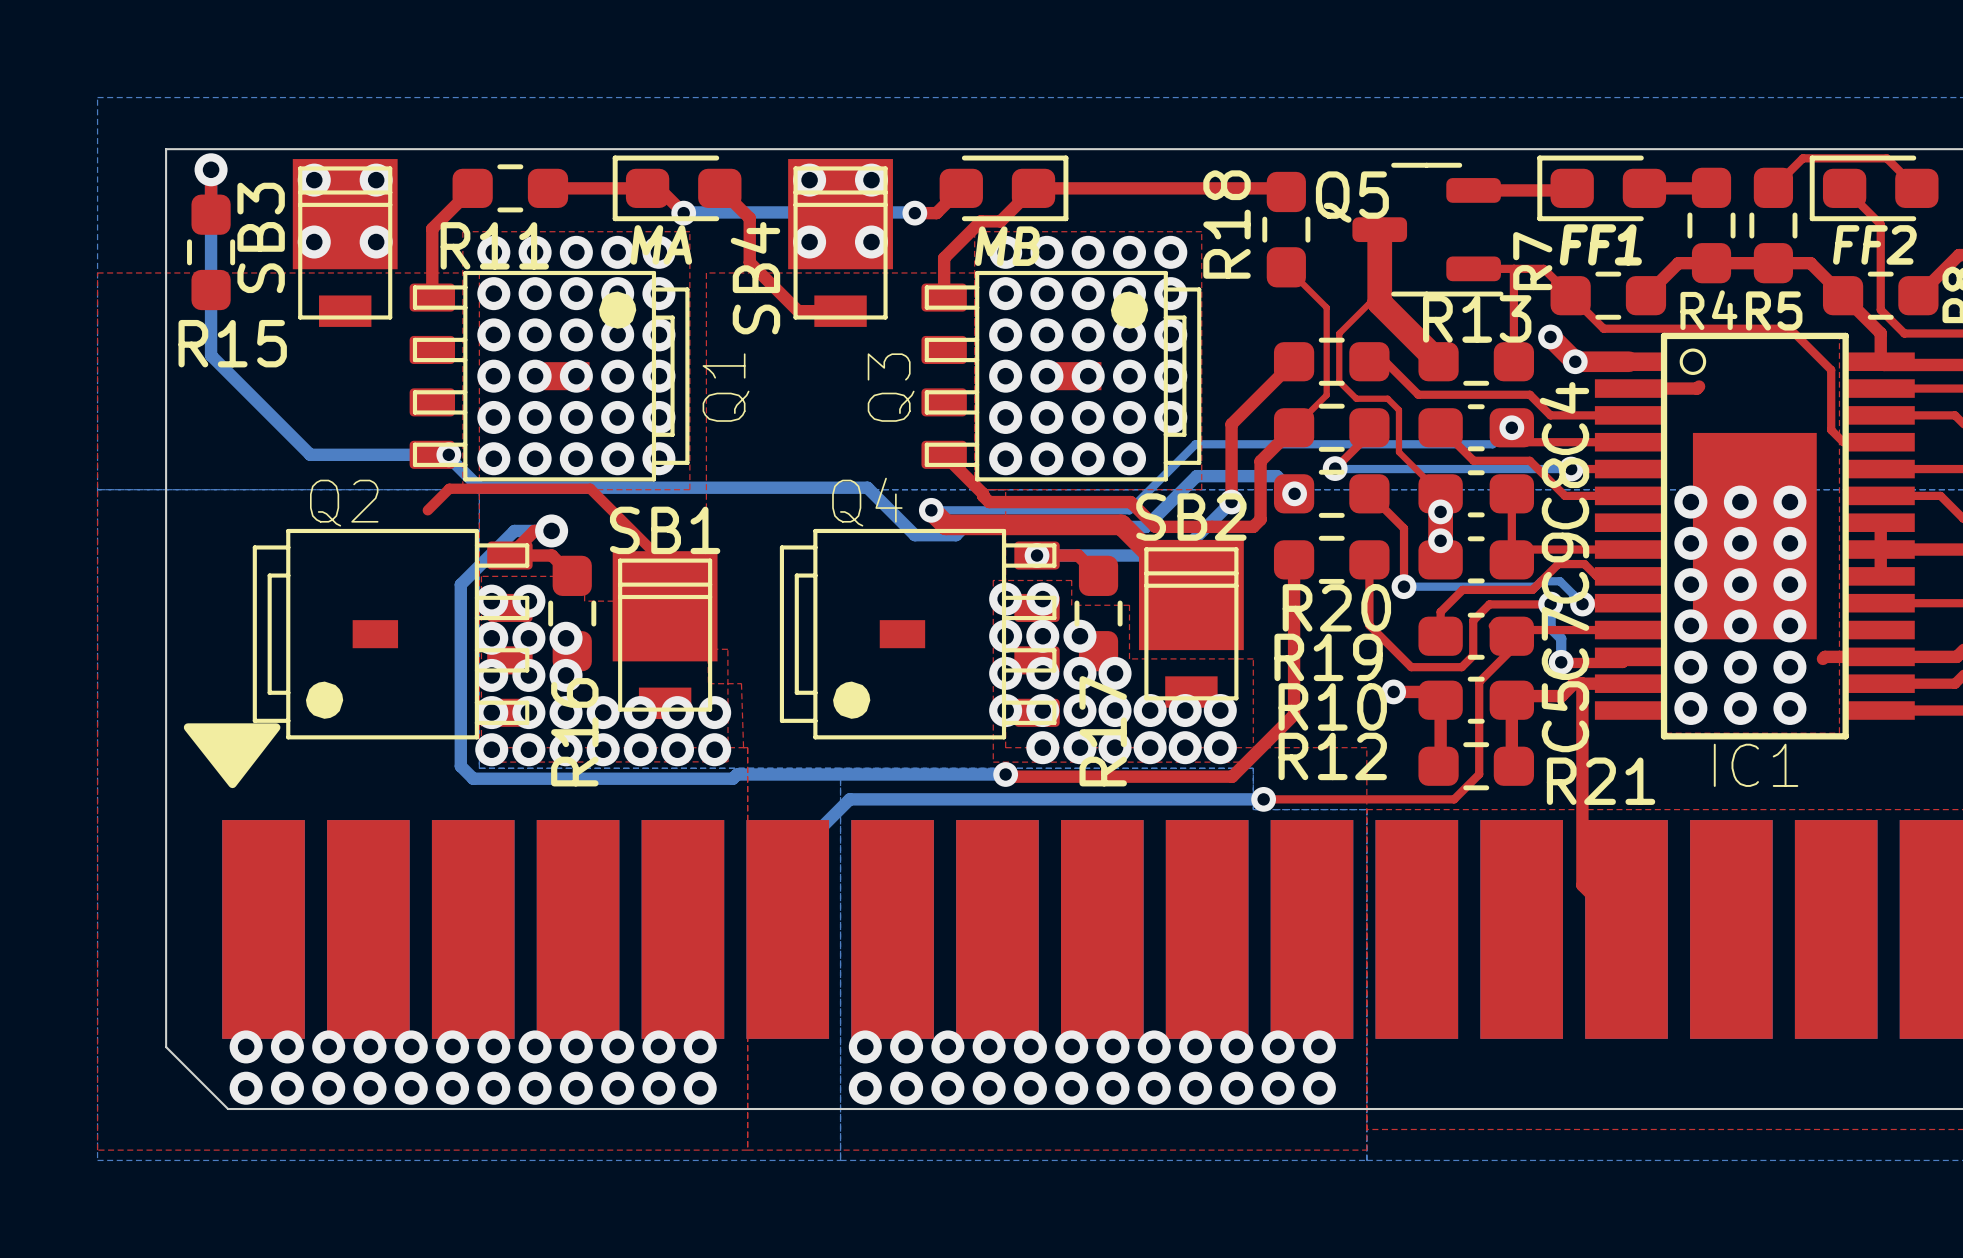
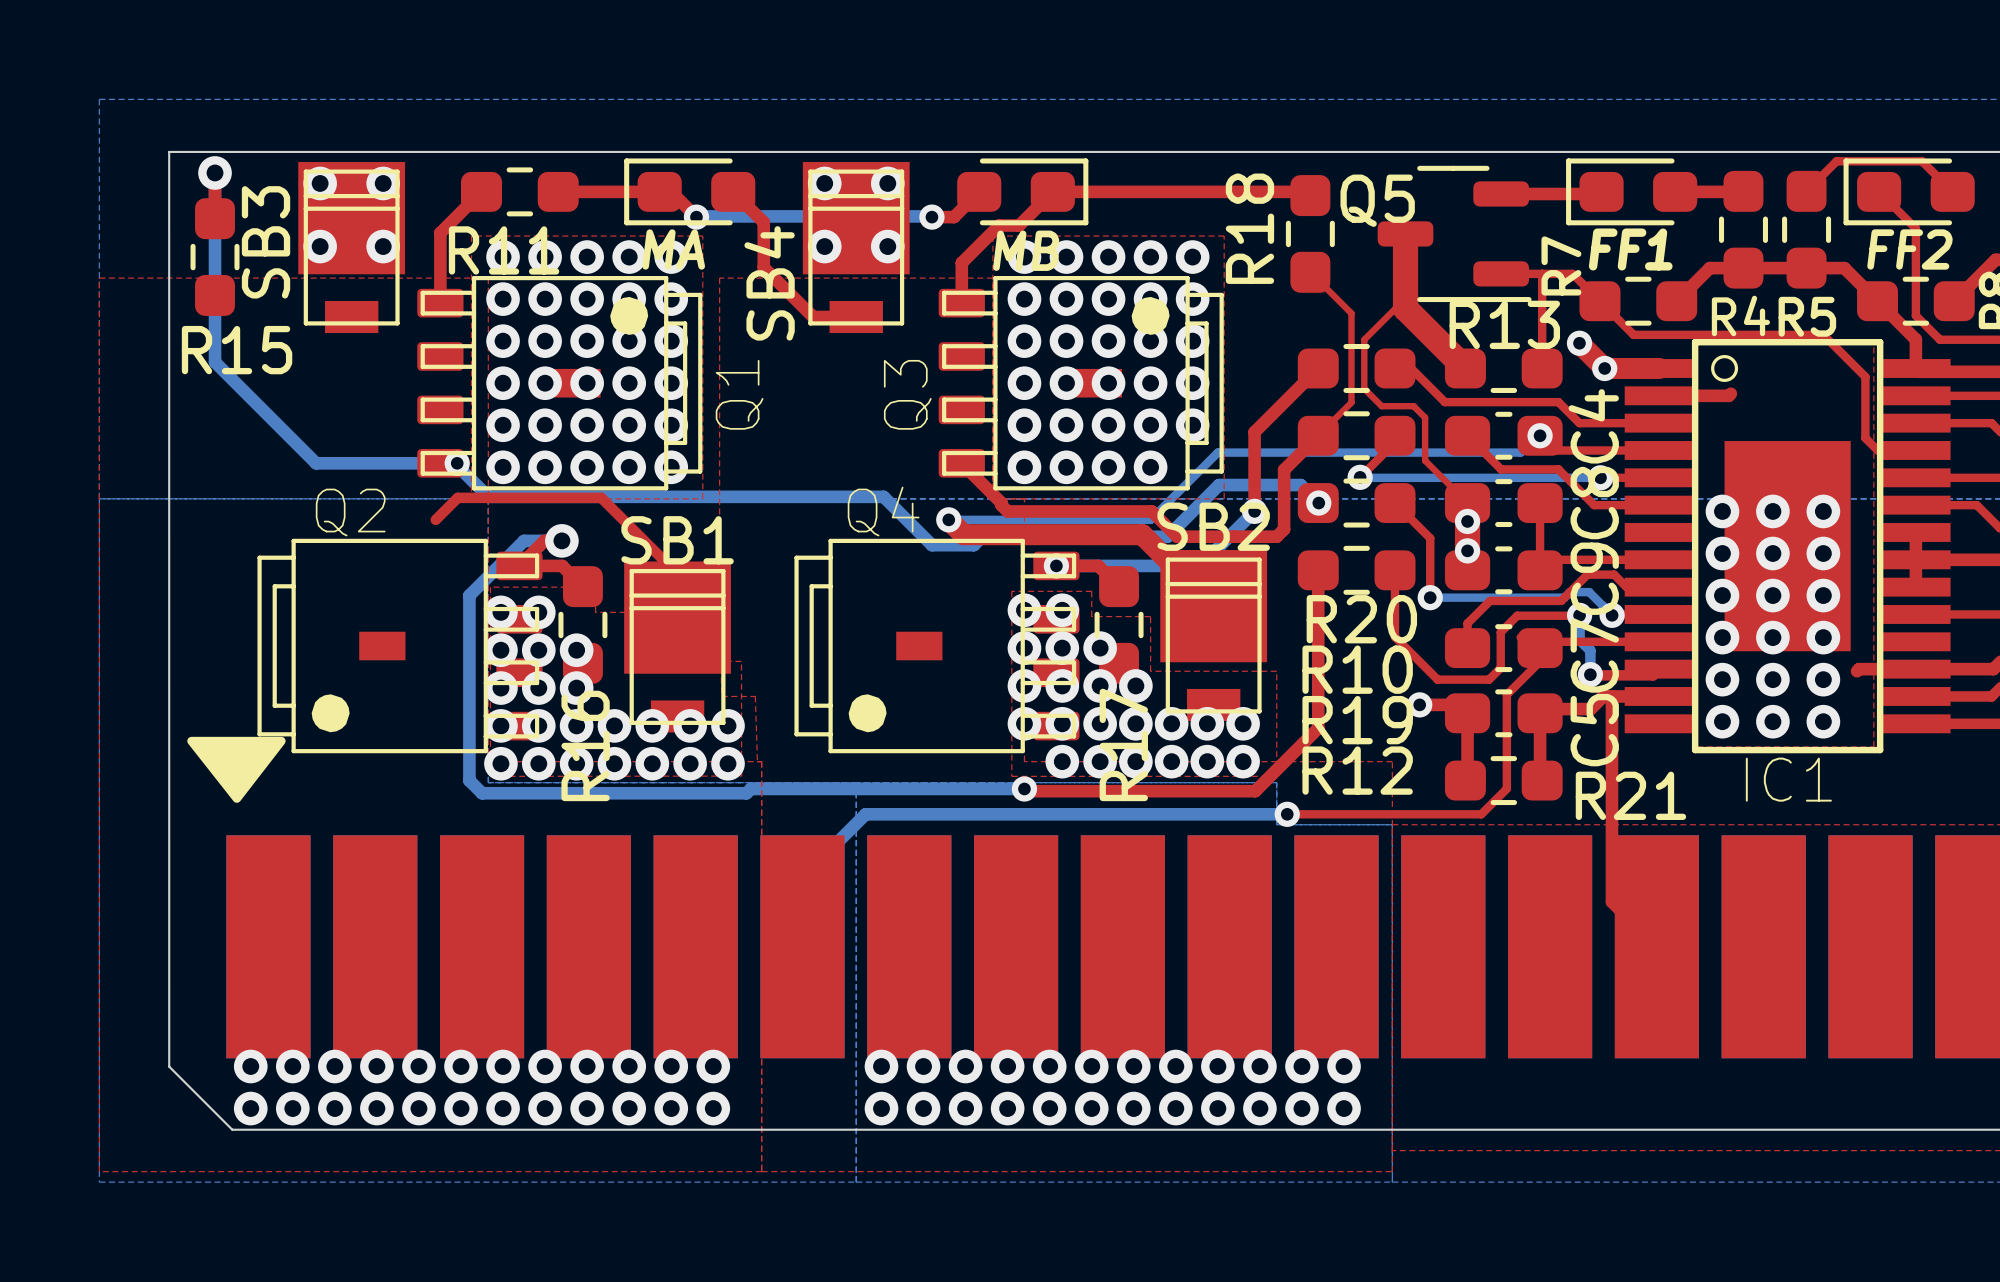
R19 name position: R19 (1328, 657) -> R19 (1357, 720)
R10 name position: R10 (1332, 706) -> R10 (1357, 669)

